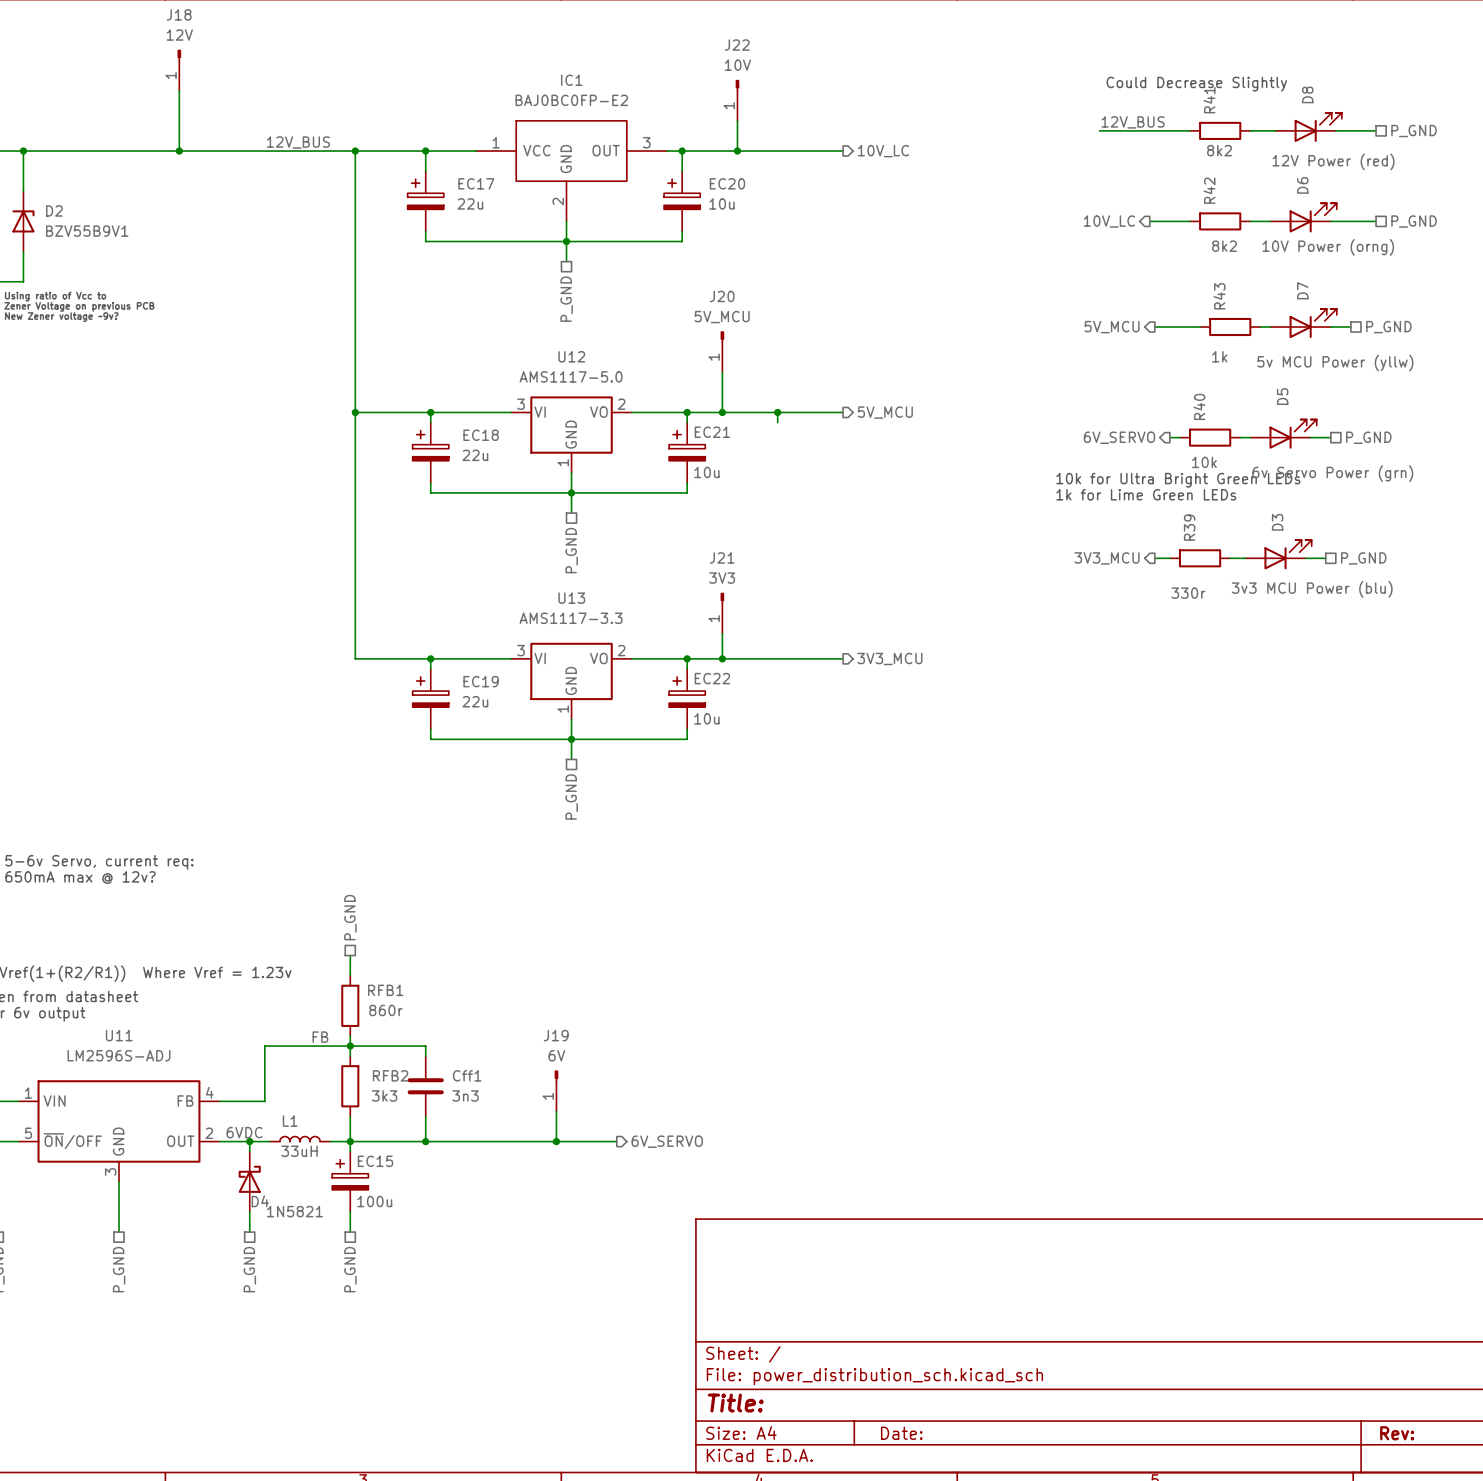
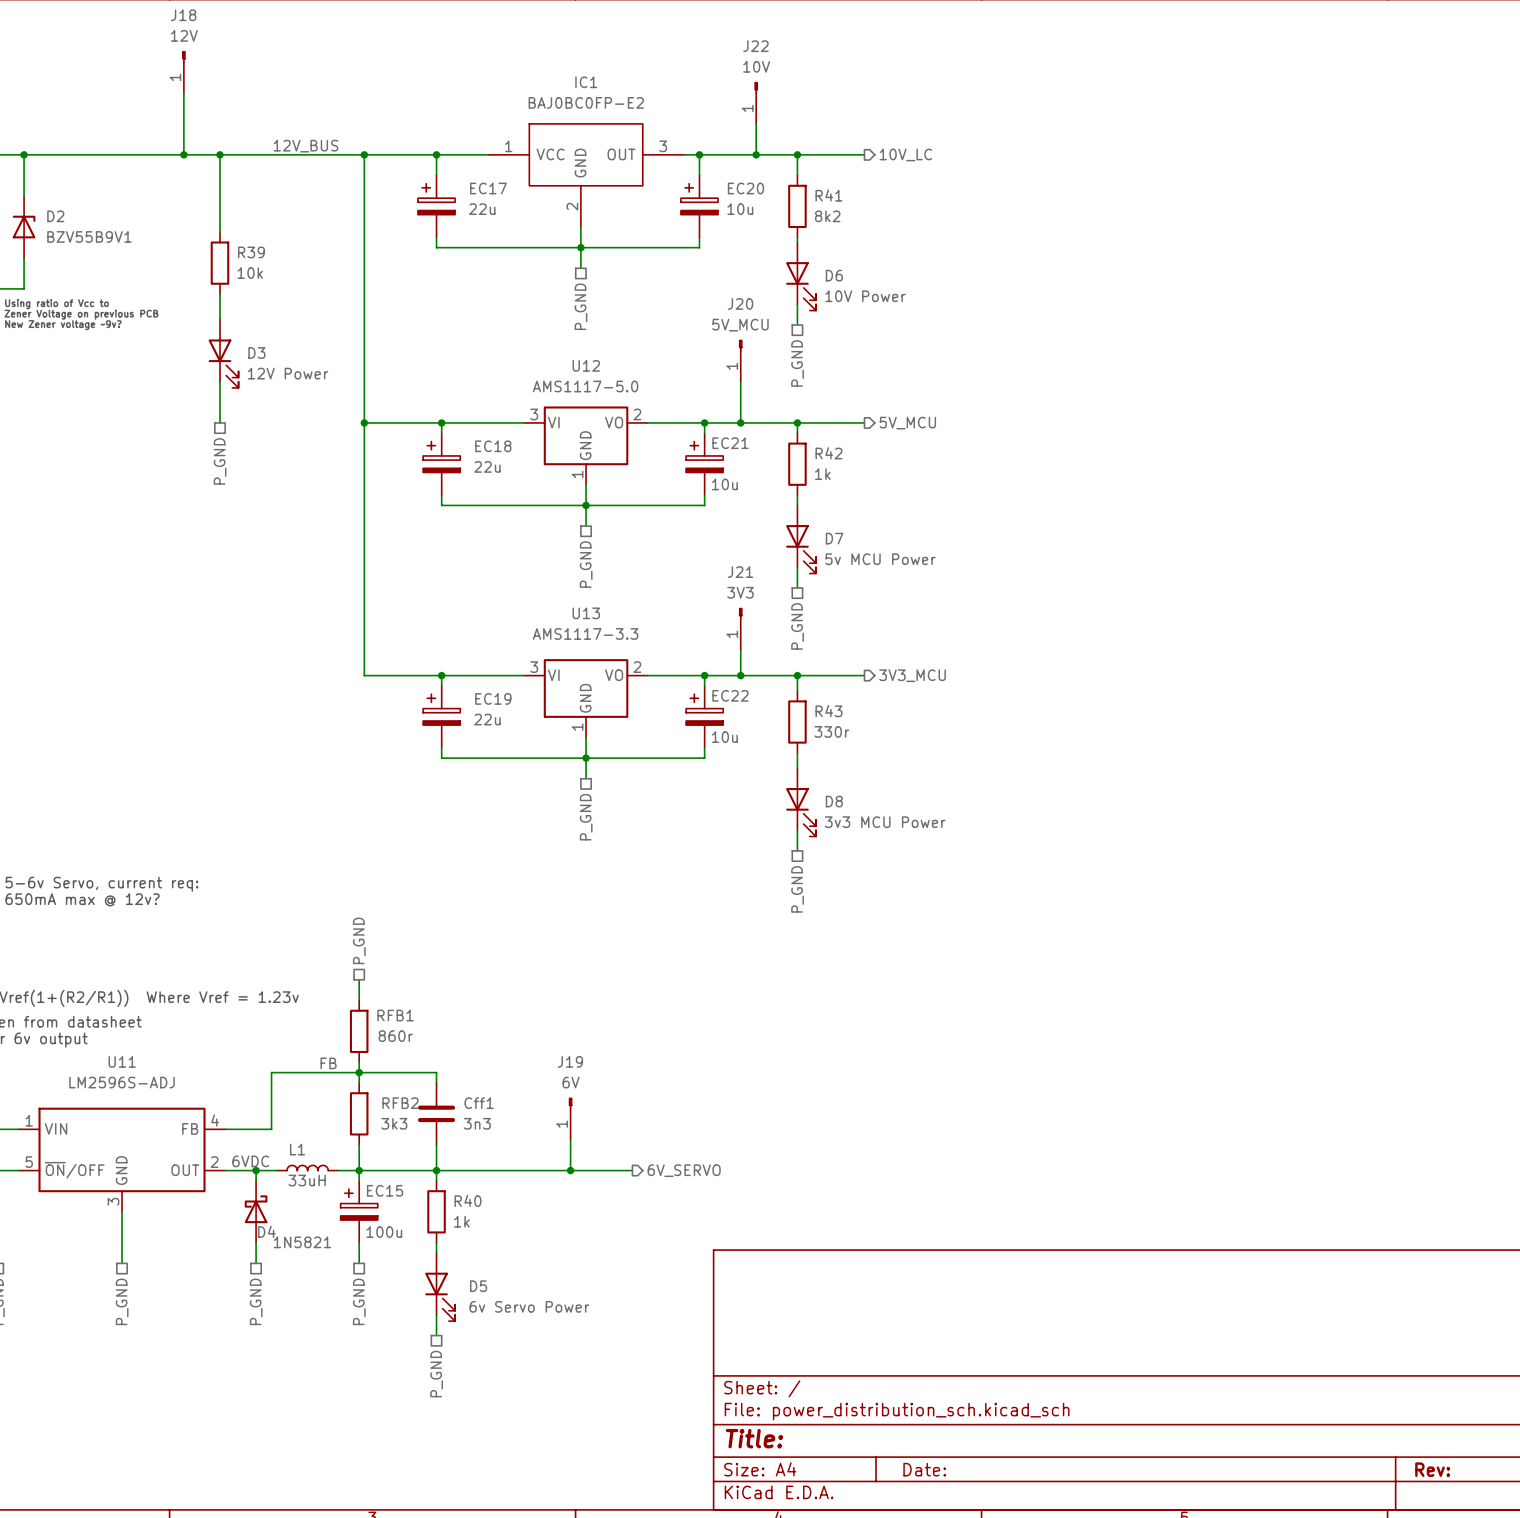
text: Could Decrease Slightly (1196, 84) -> none
label: 12V_BUS (1133, 122) -> none
D8 position: (1308, 127) -> (801, 802)
D8 rotation: 0° (1318, 127) -> 90° clockwise (801, 812)
wire: (1099, 130) (1190, 130) -> none
R41 rotation: 0° (1220, 130) -> 90° clockwise (797, 206)
R41 position: (1220, 130) -> (797, 206)
wire: (1250, 130) (1275, 130) -> none
wire: (1335, 130) (1376, 130) -> none
hierarchical label: P_GND (1414, 131) -> none
R41 value position: 8k2 (1219, 150) -> 8k2 (827, 216)
wire: none -> (219, 154) (219, 232)
junction: none -> (219, 154)
wire: none -> (797, 154) (797, 175)
junction: none -> (797, 154)
D8 value: 12V Power (red) (1333, 161) -> 3v3 MCU Power (885, 822)
D6 position: (1303, 217) -> (801, 276)
D6 rotation: 0° (1313, 217) -> 90° clockwise (801, 286)
hierarchical label: 10V_LC (1109, 221) -> none
wire: (1149, 221) (1190, 221) -> none
R42 rotation: 0° (1220, 221) -> 90° clockwise (797, 464)
R42 position: (1220, 221) -> (797, 464)
wire: (1250, 221) (1270, 221) -> none
wire: (1330, 221) (1376, 221) -> none
hierarchical label: P_GND (1414, 221) -> none
wire: none -> (797, 237) (797, 242)
R42 value: 8k2 (1224, 246) -> 1k (822, 474)
D6 value: 10V Power (orng) (1328, 247) -> 10V Power (865, 296)
wire: none -> (219, 294) (219, 319)
wire: none -> (797, 304) (797, 325)
D7 position: (1303, 323) -> (801, 539)
D7 rotation: 0° (1313, 323) -> 90° clockwise (801, 549)
hierarchical label: 5V_MCU (1112, 327) -> none
wire: (1154, 327) (1200, 327) -> none
R43 rotation: 0° (1230, 327) -> 90° clockwise (797, 722)
R43 position: (1230, 327) -> (797, 722)
wire: (1260, 327) (1270, 327) -> none
wire: (1330, 327) (1350, 327) -> none
hierarchical label: P_GND (1388, 327) -> none
hierarchical label: none -> P_GND (797, 363)
R43 value: 1k (1219, 356) -> 330r (831, 731)
D7 value: 5v MCU Power (yllw) (1335, 363) -> 5v MCU Power (880, 559)
wire: none -> (219, 381) (219, 422)
D5 position: (1283, 434) -> (440, 1287)
D5 rotation: 0° (1293, 434) -> 90° clockwise (440, 1296)
hierarchical label: 6V_SERVO (1119, 437) -> none
wire: (1169, 437) (1179, 437) -> none
R40 rotation: 0° (1210, 437) -> 90° clockwise (436, 1211)
R40 position: (1210, 437) -> (436, 1211)
wire: (1240, 437) (1250, 437) -> none
wire: (1310, 437) (1330, 437) -> none
hierarchical label: P_GND (1368, 437) -> none
hierarchical label: none -> P_GND (220, 461)
R40 value: 10k (1204, 462) -> 1k (461, 1221)
D5 value: 6v Servo Power (grn) (1332, 473) -> 6v Servo Power (529, 1306)
text: 10k for Ultra Bright Green LEDs (1178, 480) -> none
wire: none -> (797, 495) (797, 505)
text: 1k for Lime Green LEDs (1146, 494) -> none
wire: none -> (797, 567) (797, 587)
D3 position: (1278, 554) -> (223, 353)
D3 rotation: 0° (1288, 554) -> 90° clockwise (223, 363)
hierarchical label: 3V3_MCU (1107, 558) -> none
wire: (1154, 558) (1169, 558) -> none
R39 rotation: 0° (1200, 558) -> 90° clockwise (219, 263)
R39 position: (1200, 558) -> (219, 263)
wire: (1230, 558) (1245, 558) -> none
wire: (1305, 558) (1325, 558) -> none
hierarchical label: P_GND (1363, 558) -> none
D3 value: 3v3 MCU Power (blu) (1312, 589) -> 12V Power (288, 373)
R39 value: 330r (1188, 593) -> 10k (250, 273)
hierarchical label: none -> P_GND (797, 626)
wire: none -> (797, 675) (797, 691)
junction: none -> (797, 675)
wire: none -> (797, 752) (797, 768)
wire: none -> (797, 830) (797, 850)
hierarchical label: none -> P_GND (797, 889)
wire: none -> (436, 1170) (436, 1180)
wire: none -> (436, 1242) (436, 1253)
wire: none -> (436, 1314) (436, 1335)
hierarchical label: none -> P_GND (436, 1374)

